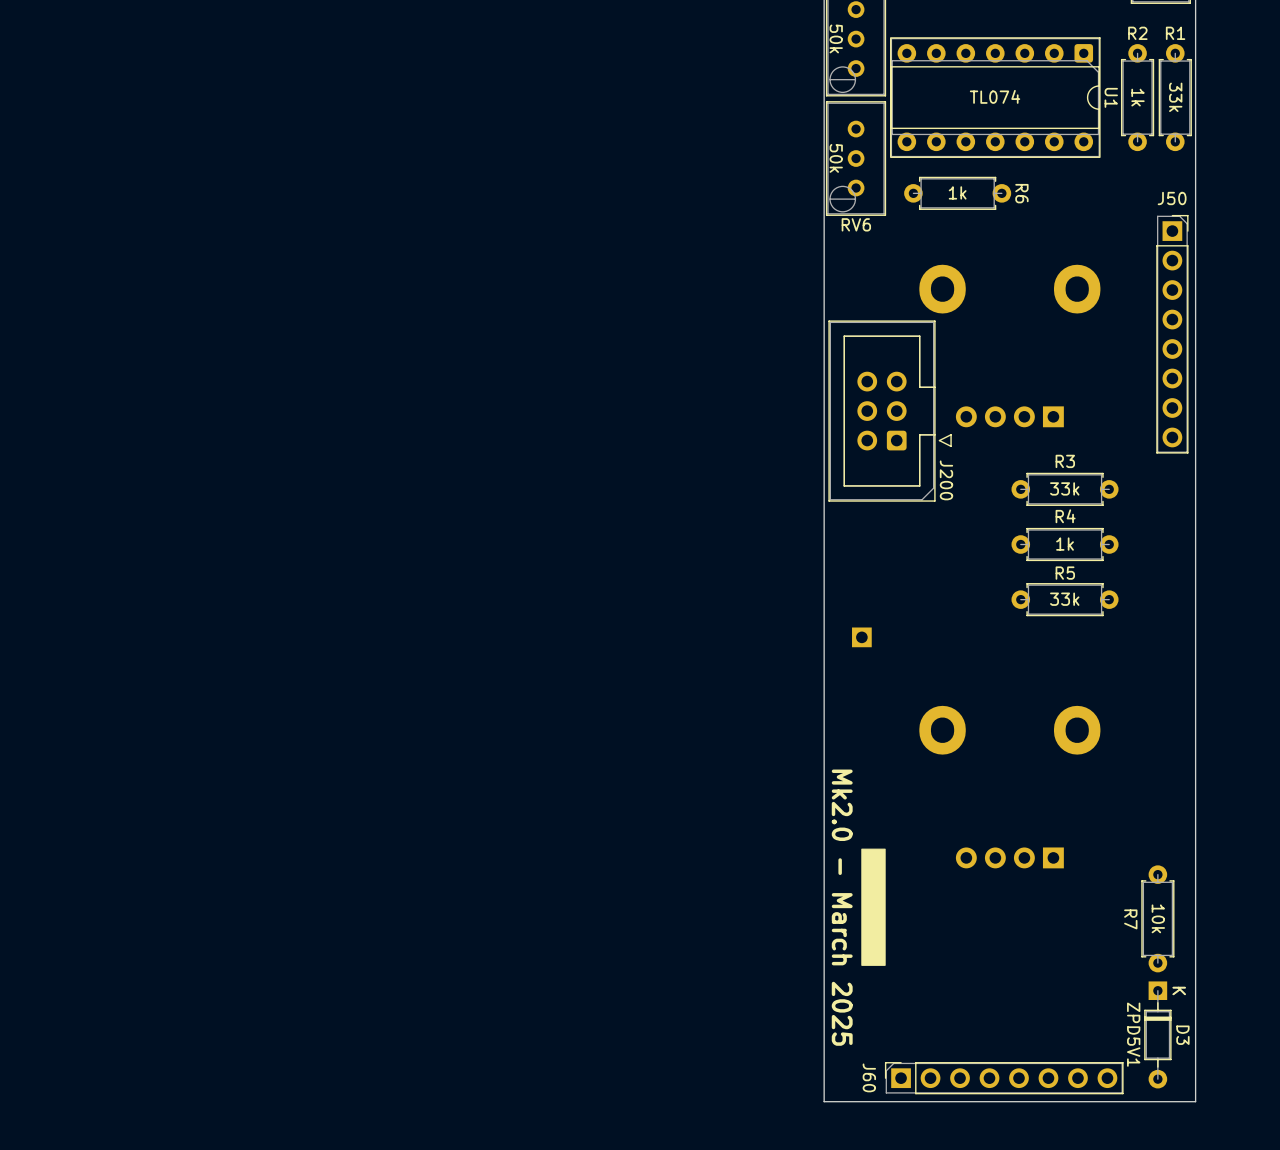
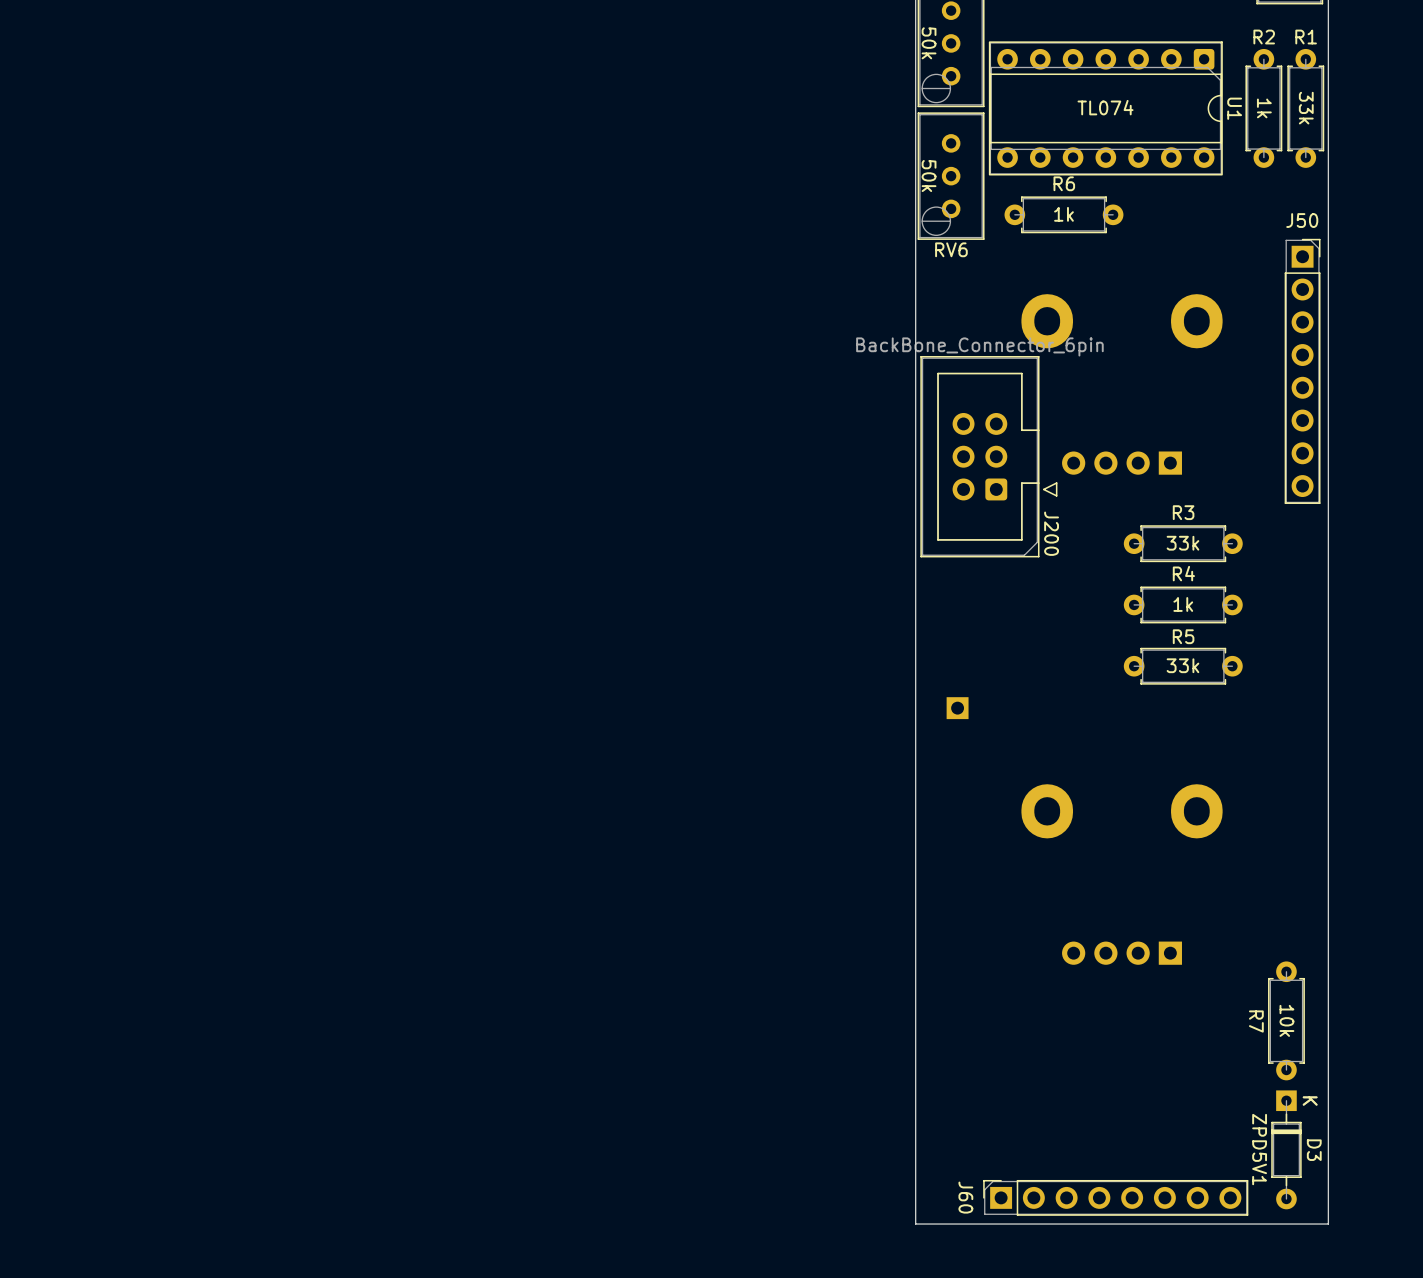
R6 name rotation: 0° (1021, 193) -> 90° counterclockwise (1064, 183)
R6 name position: R6 (1021, 193) -> R6 (1064, 183)
J200 value: none -> BackBone_Connector_6pin (979, 346)
drawing: [861, 848, 886, 966] -> none
text: Mk2.0 - March 2025 (842, 907) -> none

